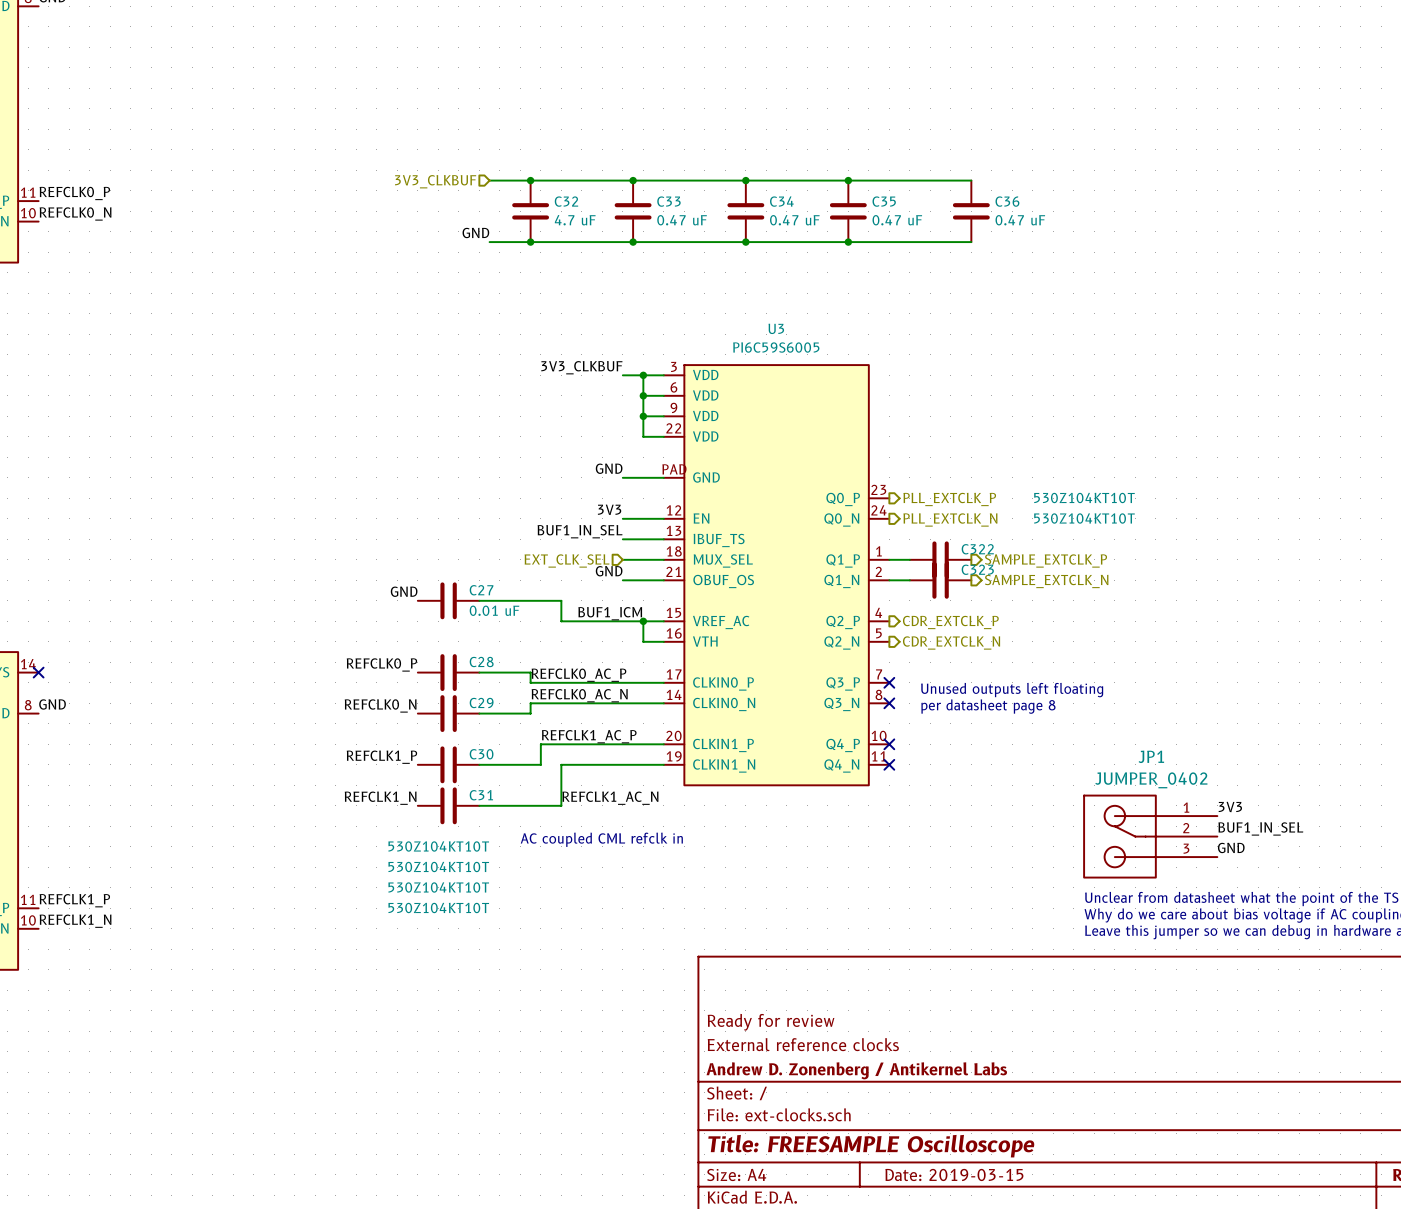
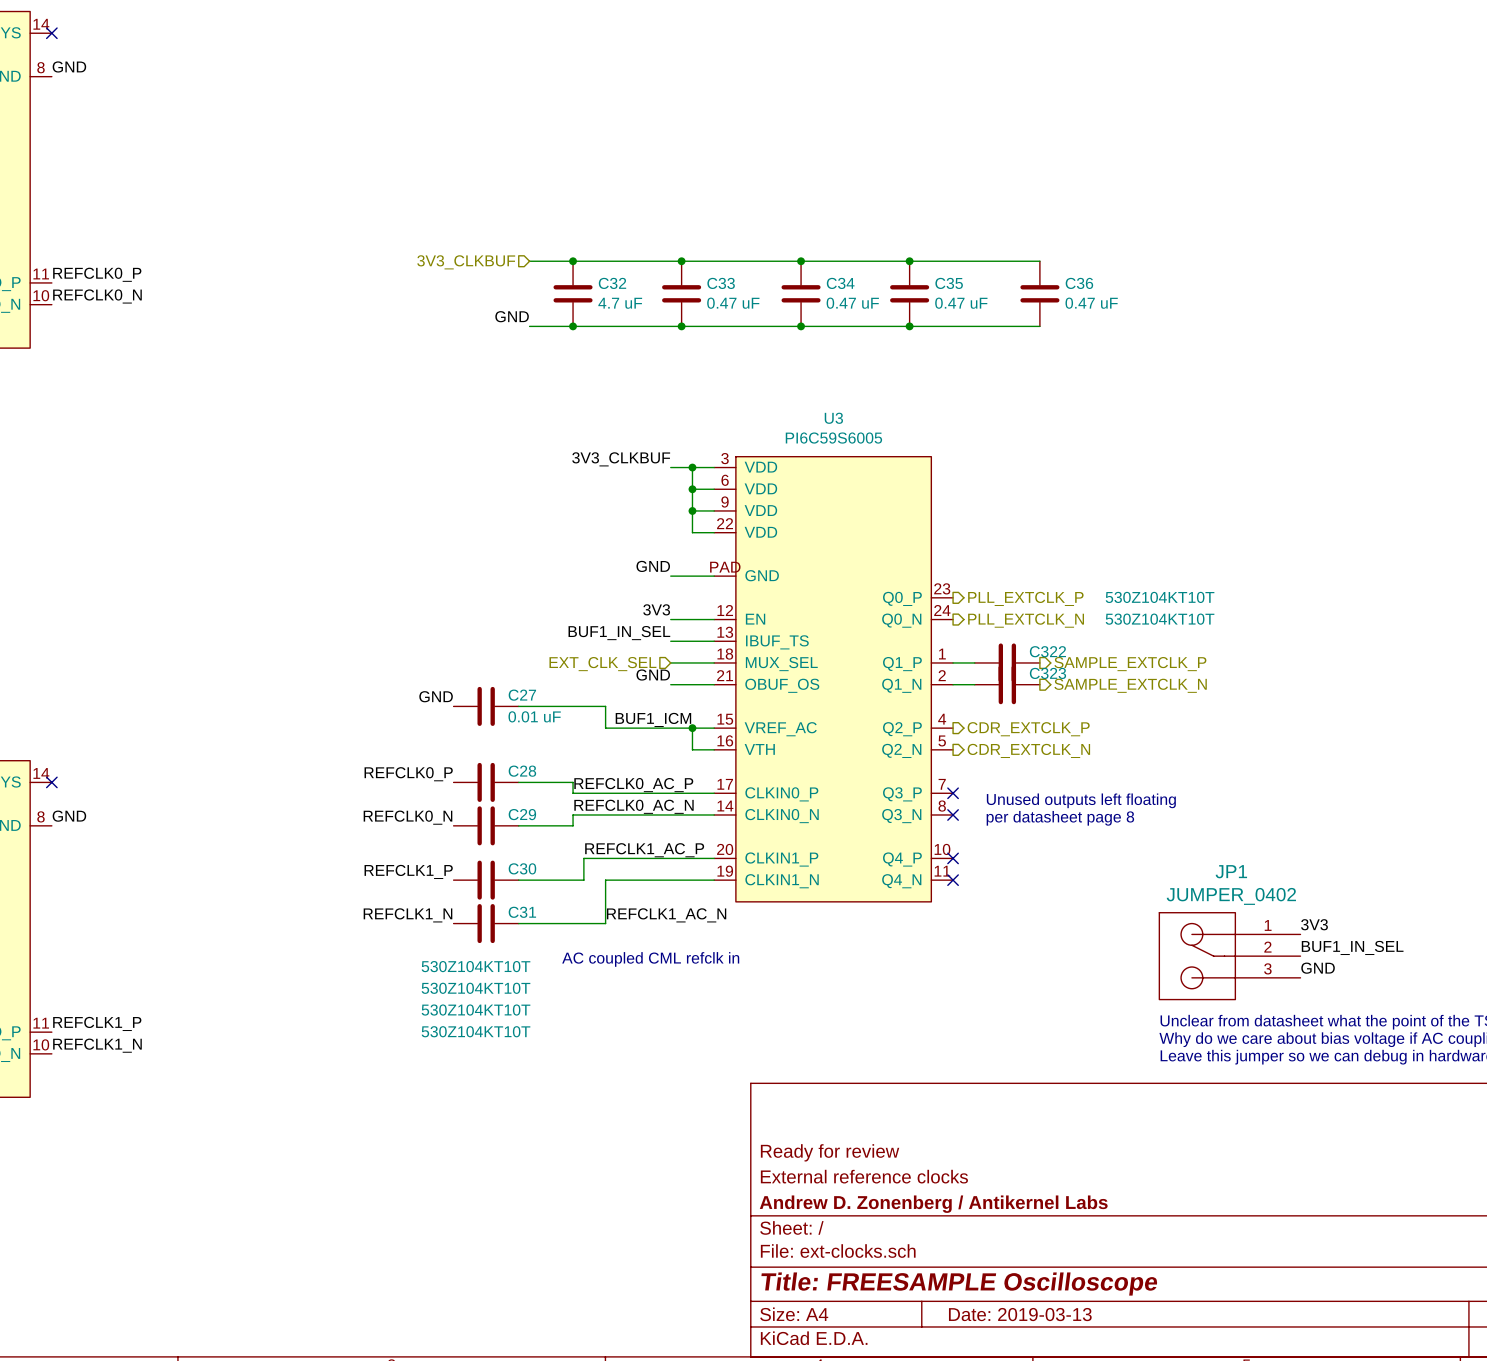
title block: Date: 2019-03-15 (954, 1174) -> Date: 2019-03-13 (1020, 1314)

